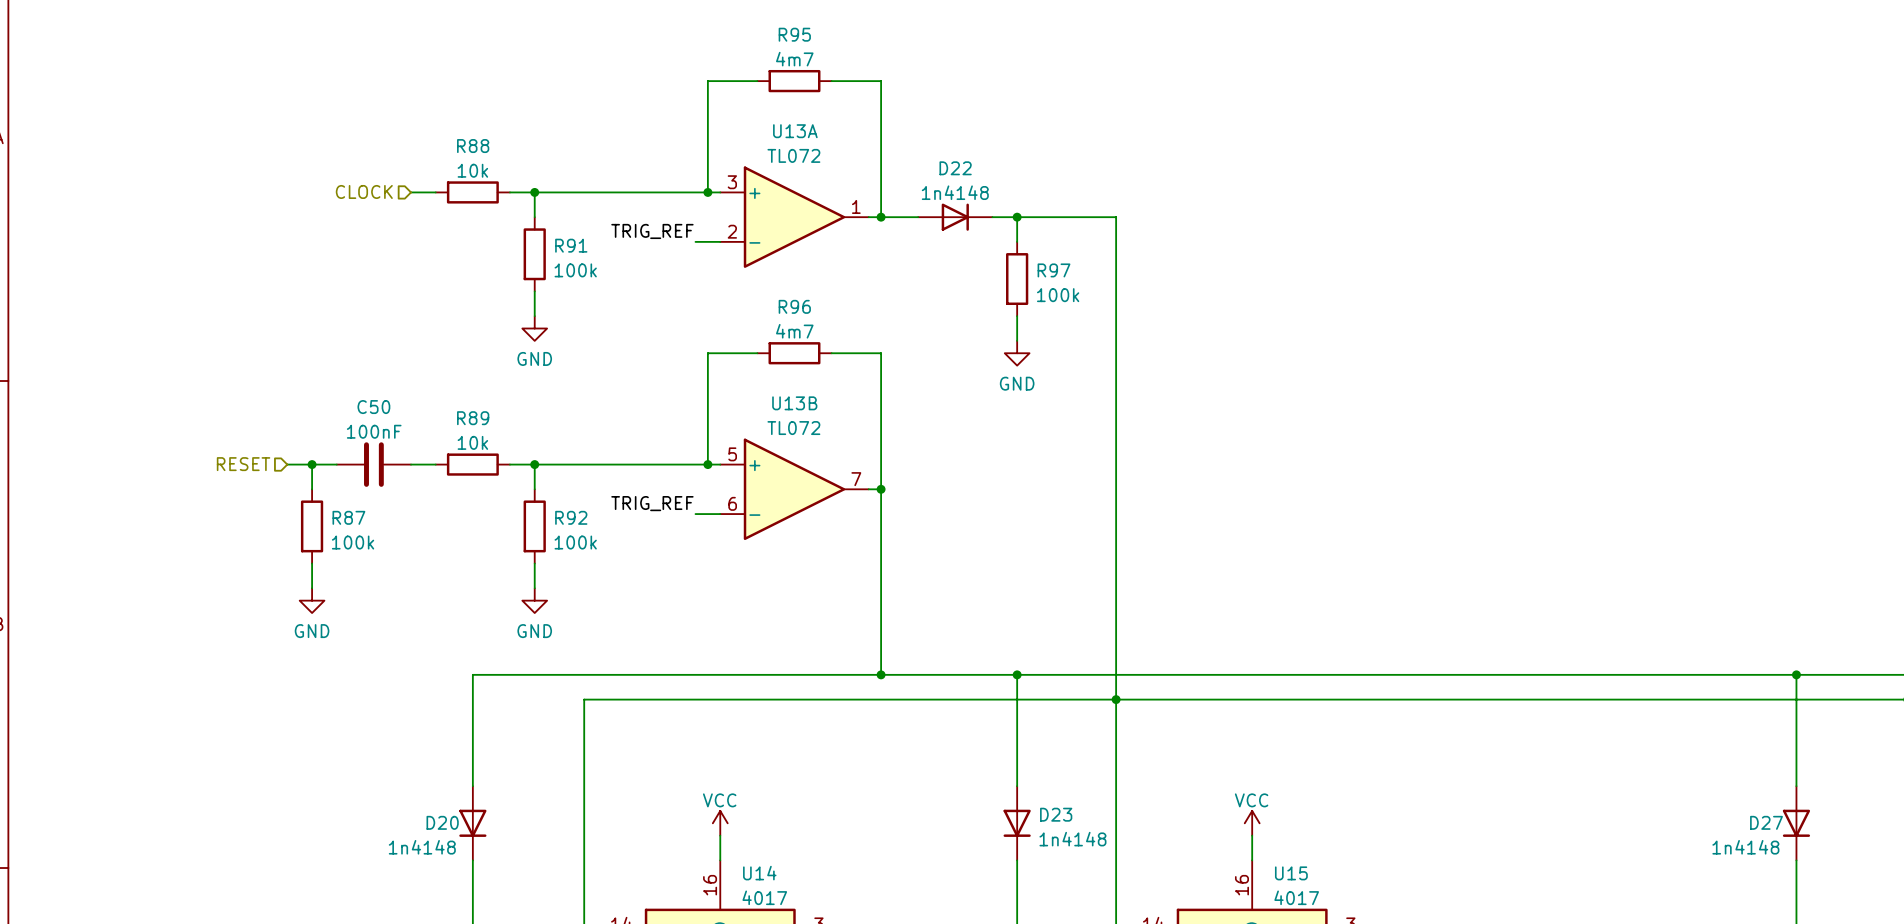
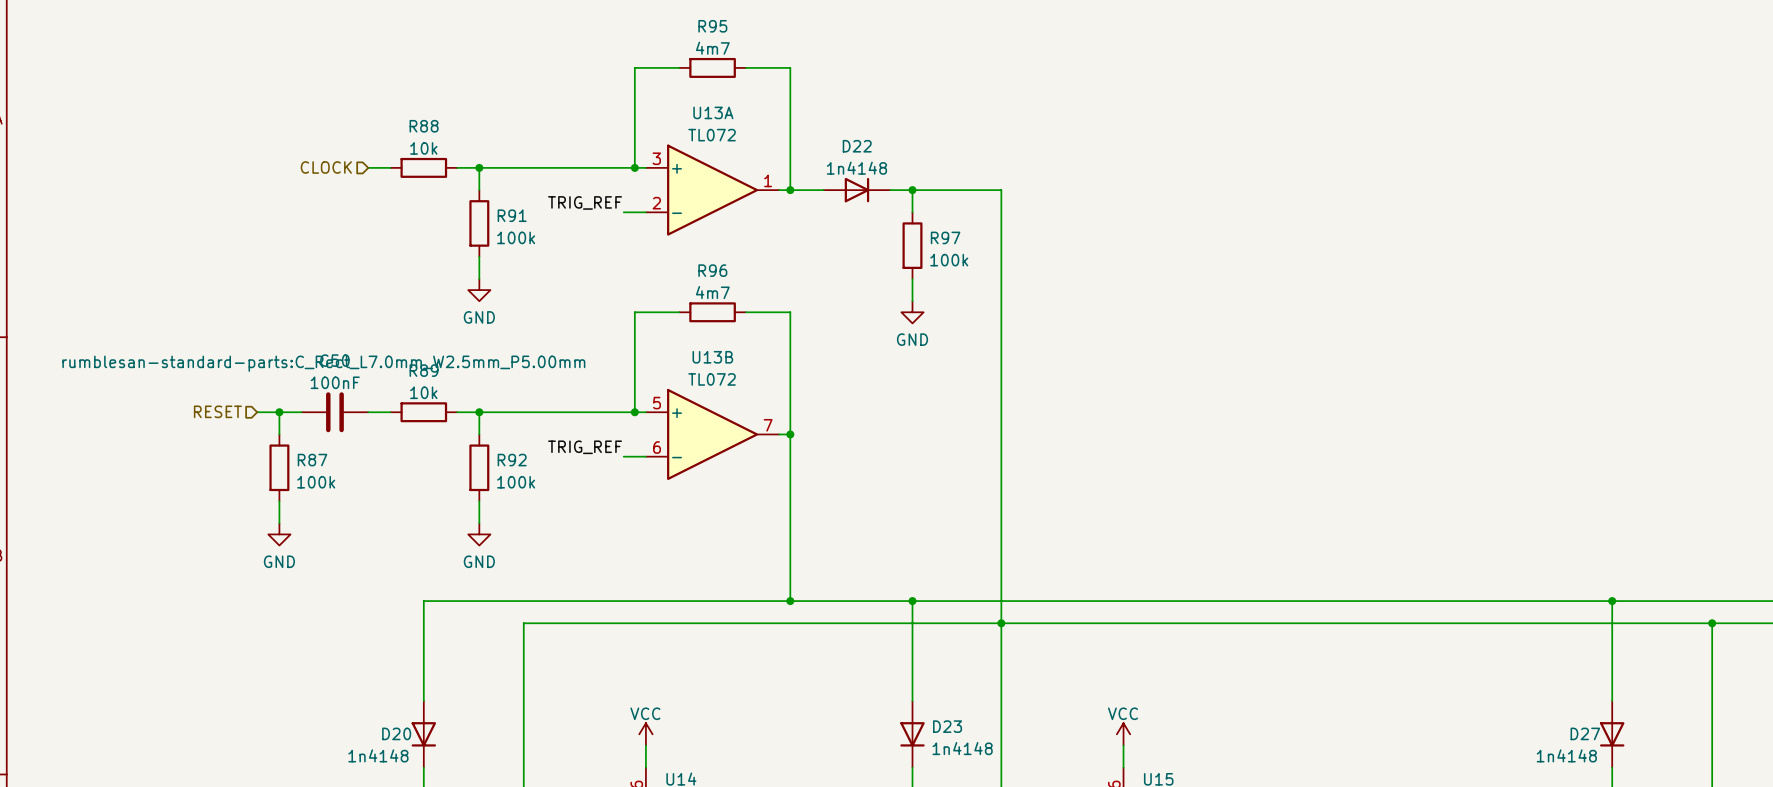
C50 text: none -> rumblesan-standard-parts:C_Rect_L7.0mm_W2.5mm_P5.00mm (323, 363)

